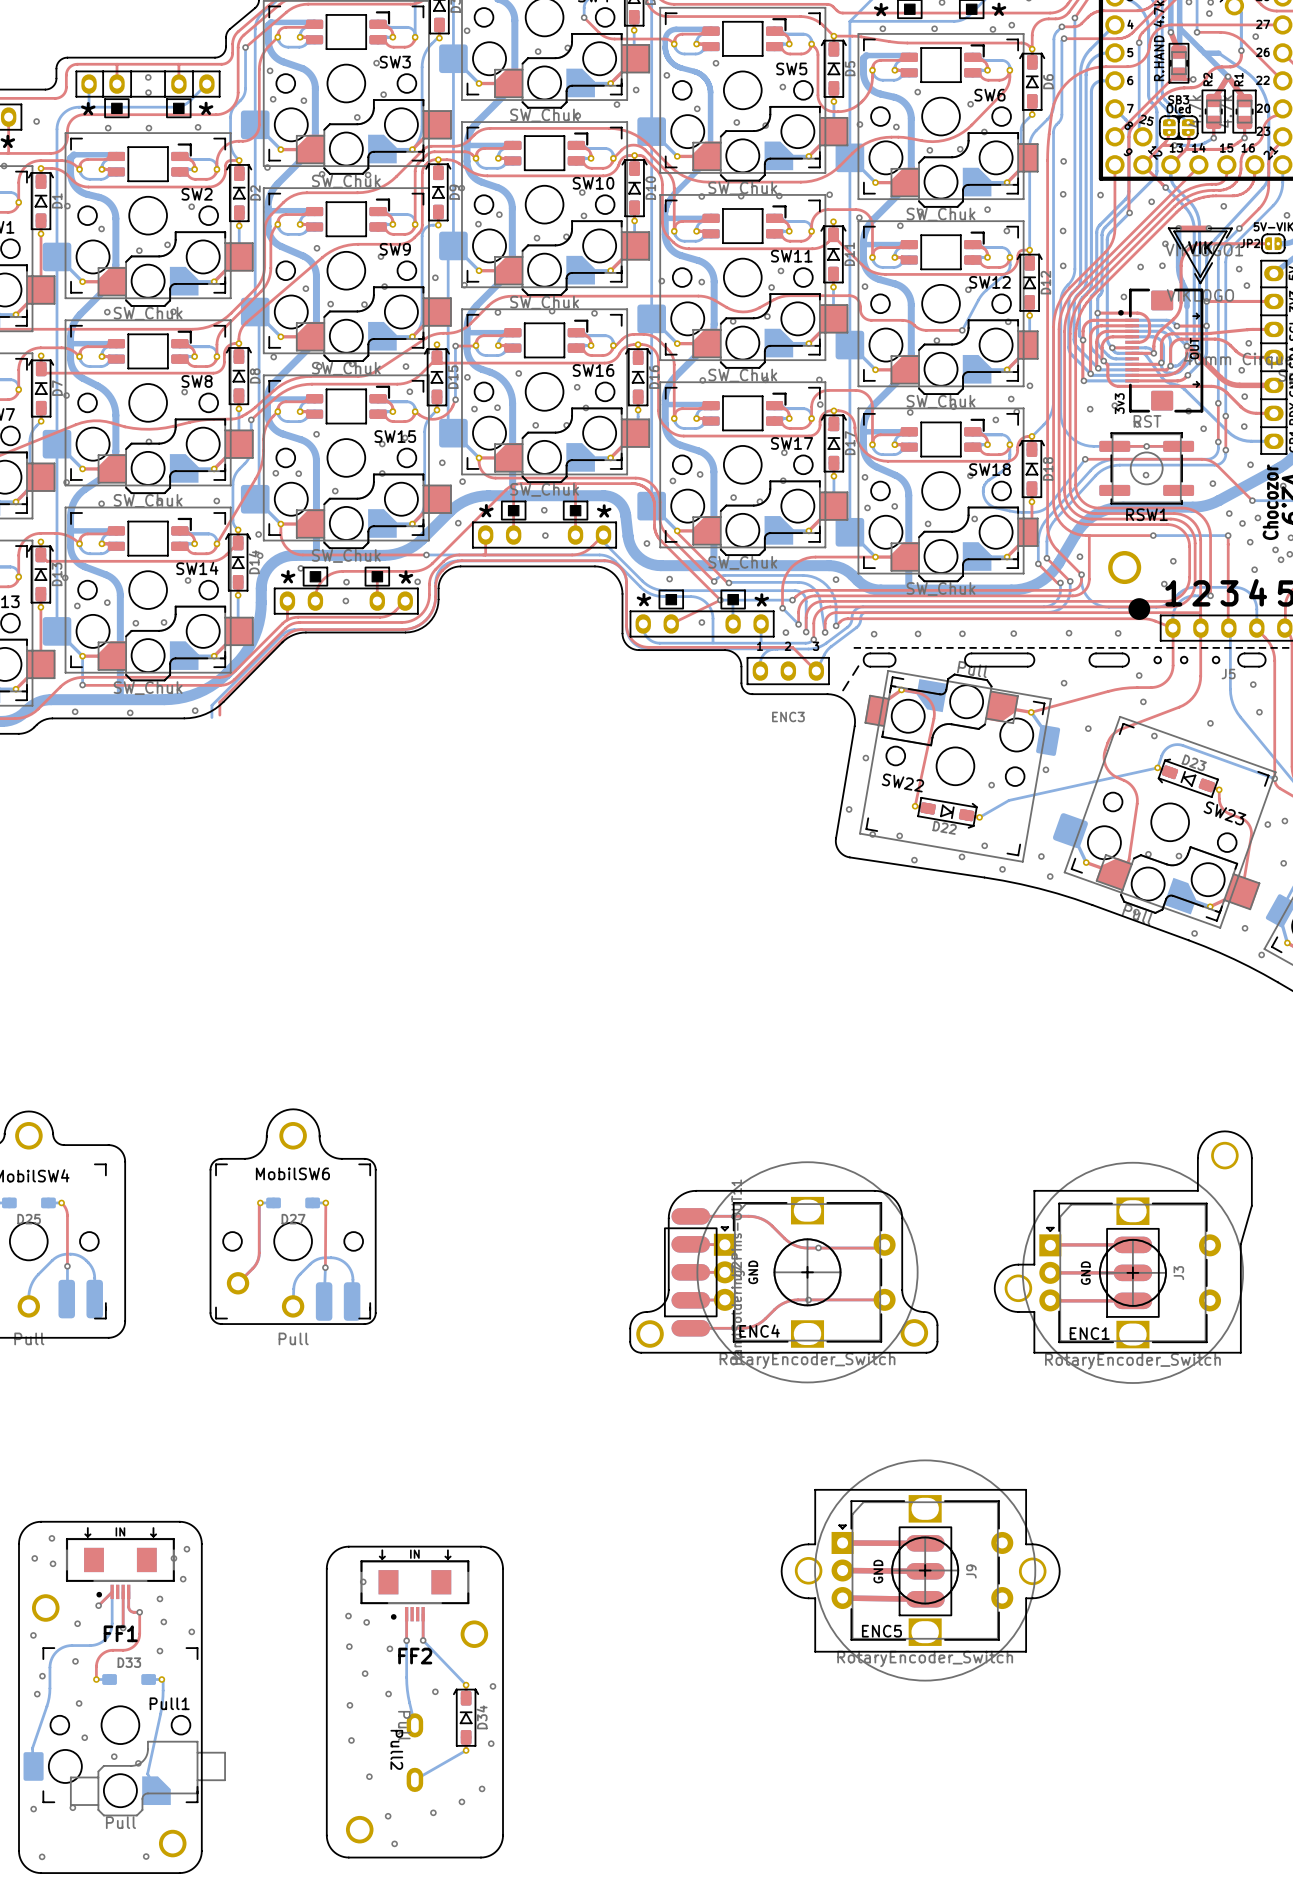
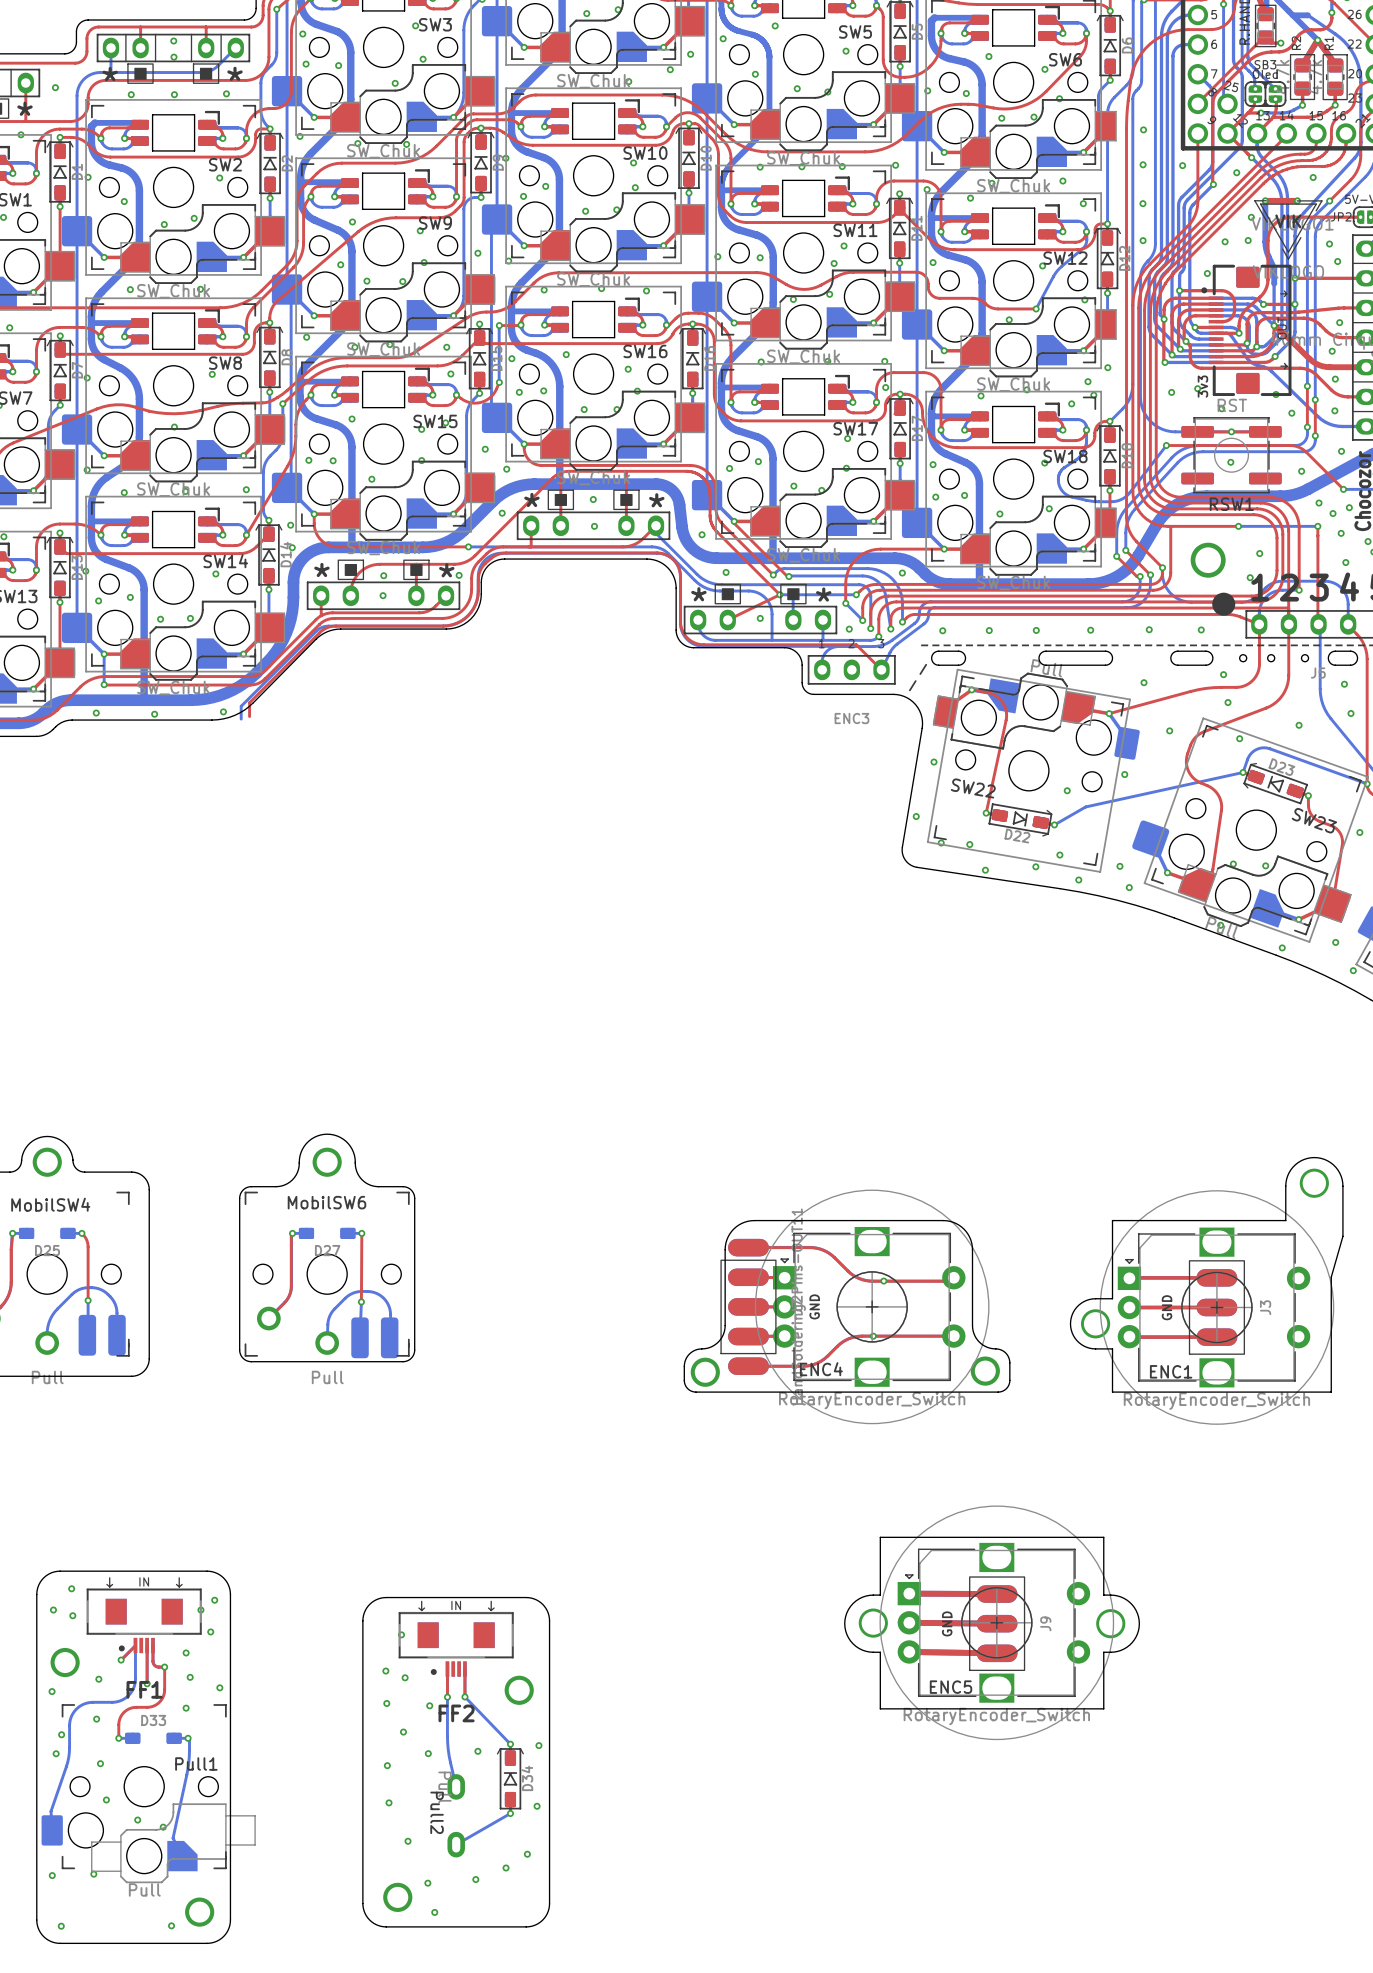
via: (1079, 556) -> none
via: (300, 568) -> none

